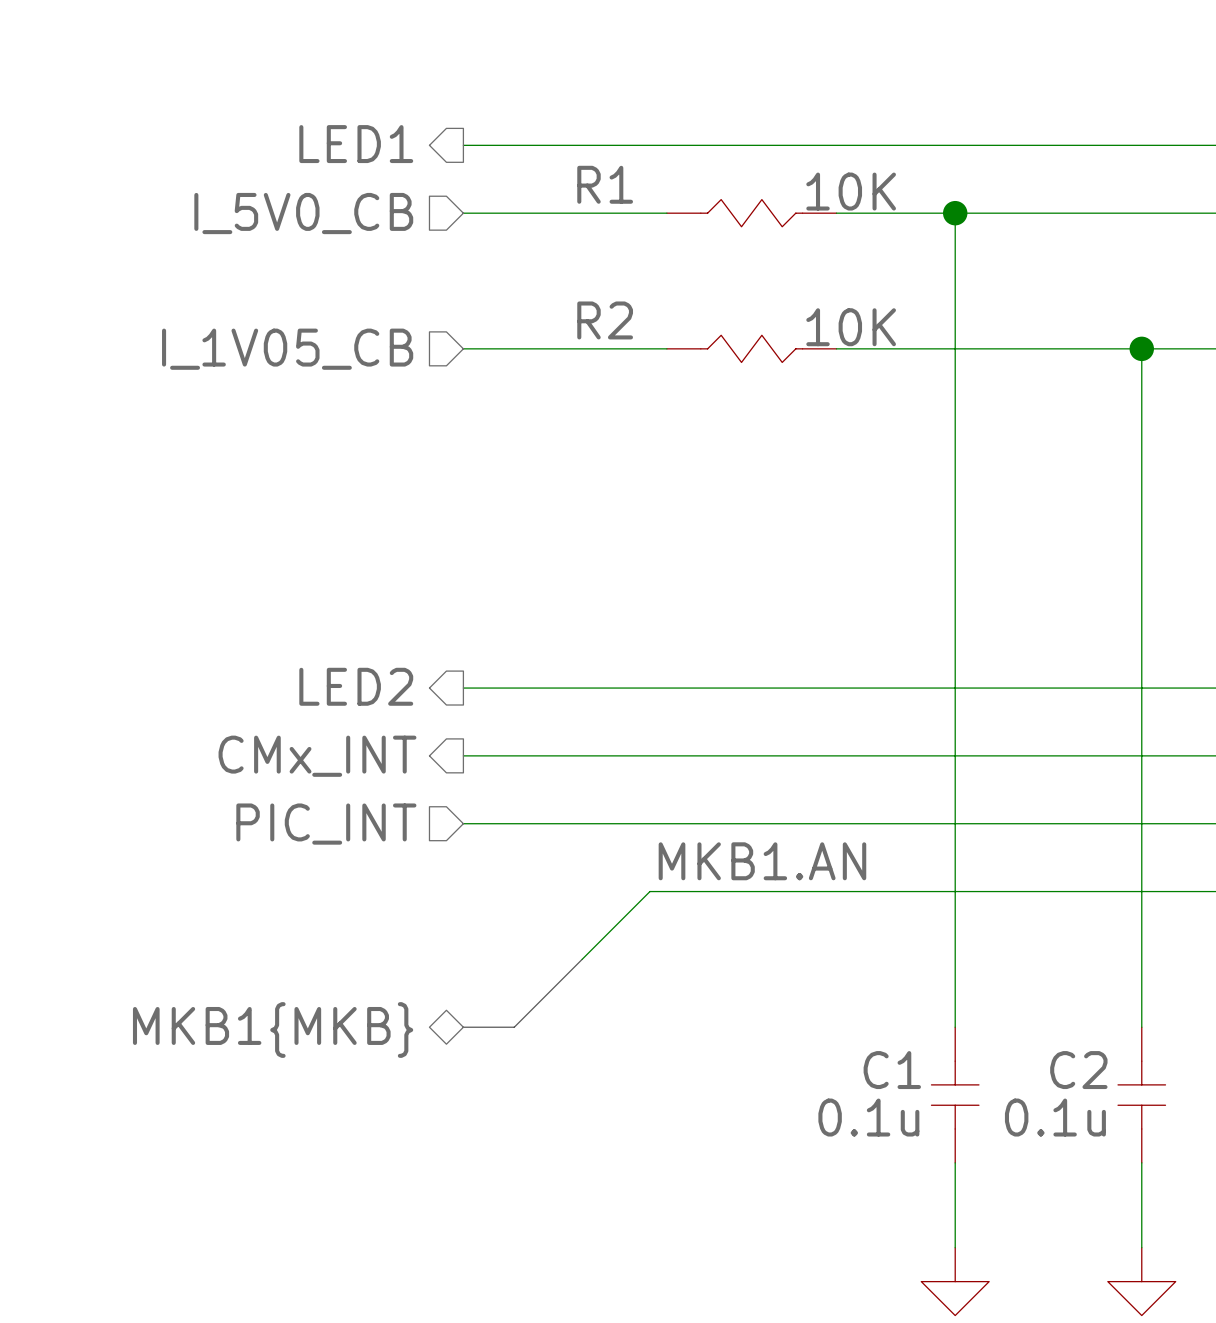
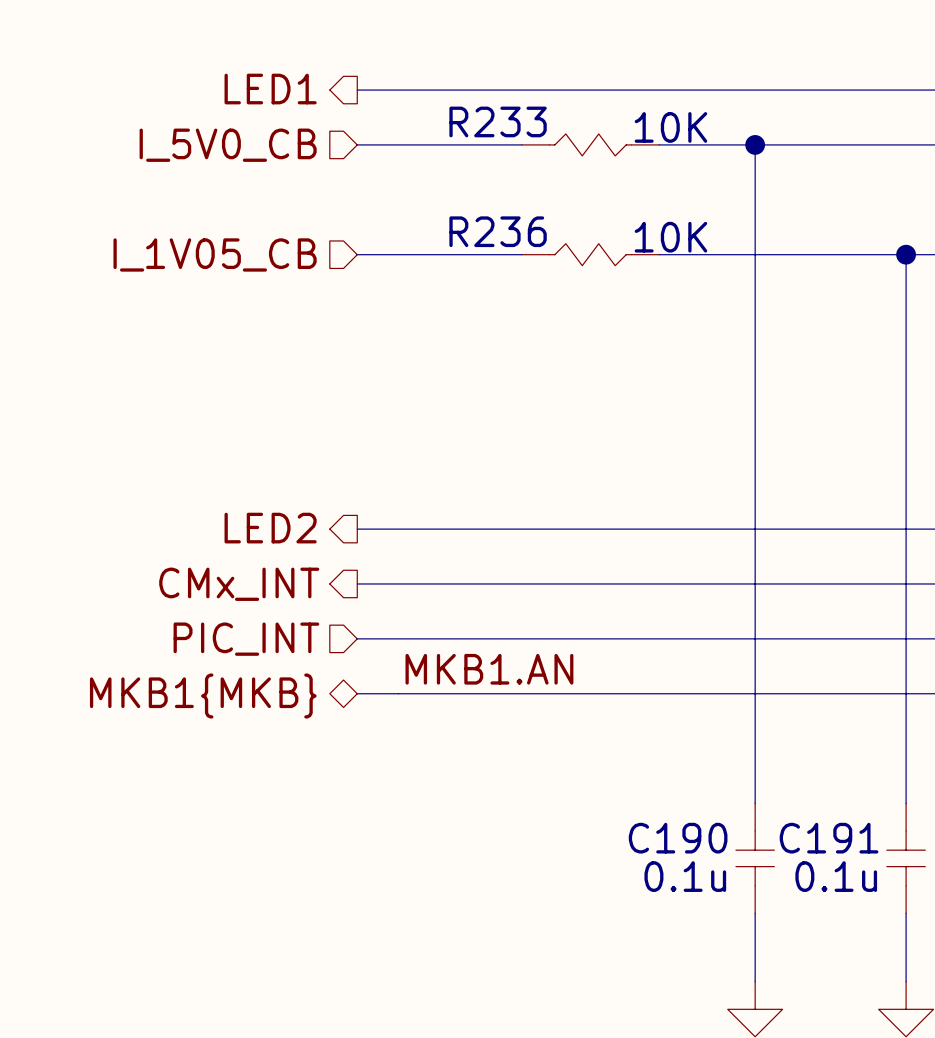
R1 name: R1 (605, 184) -> R233 (498, 121)
R2 name: R2 (605, 320) -> R236 (498, 231)
label position: MKB1.AN (762, 861) -> MKB1.AN (489, 669)
bus: none -> (357, 693) (398, 693)
wire: (649, 891) (582, 959) -> (508, 693) (398, 693)
bus: (582, 959) (514, 1027) (463, 1027) -> none
hierarchical label position: MKB1{MKB} (273, 1030) -> MKB1{MKB} (203, 695)
C1 name: C1 (892, 1070) -> C190 (678, 838)
C2 name: C2 (1078, 1070) -> C191 (829, 838)

